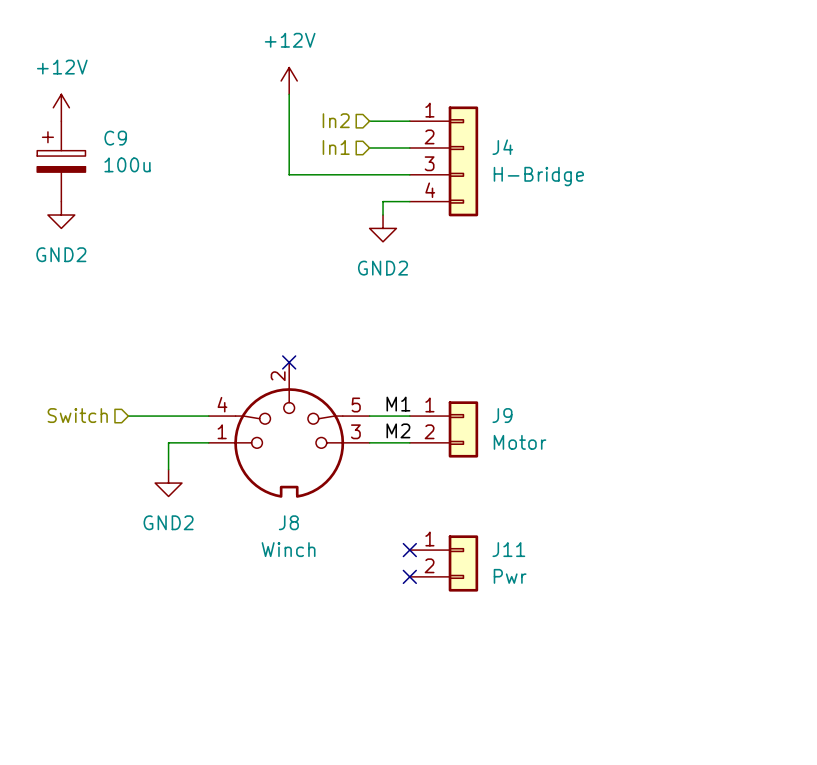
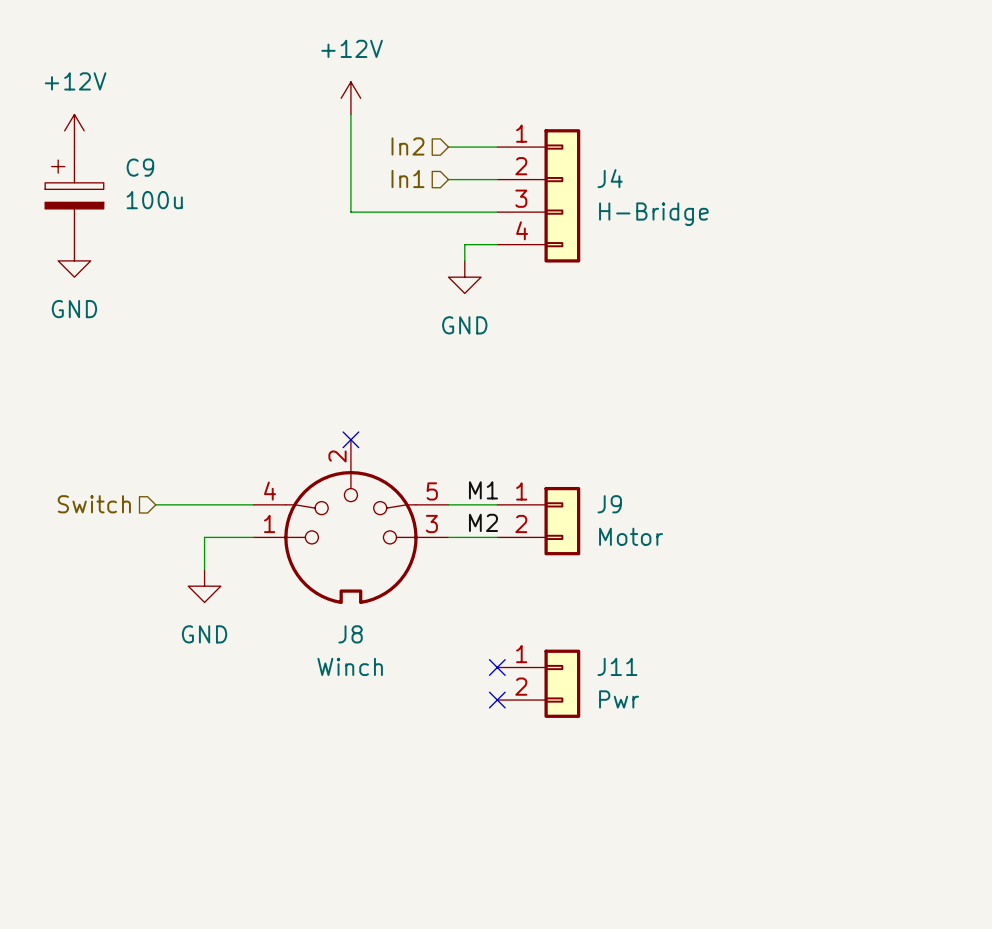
power symbol: GND2 (61, 215) -> GND (74, 260)
power symbol: GND2 (383, 228) -> GND (464, 277)
power symbol: GND2 (168, 483) -> GND (204, 586)

